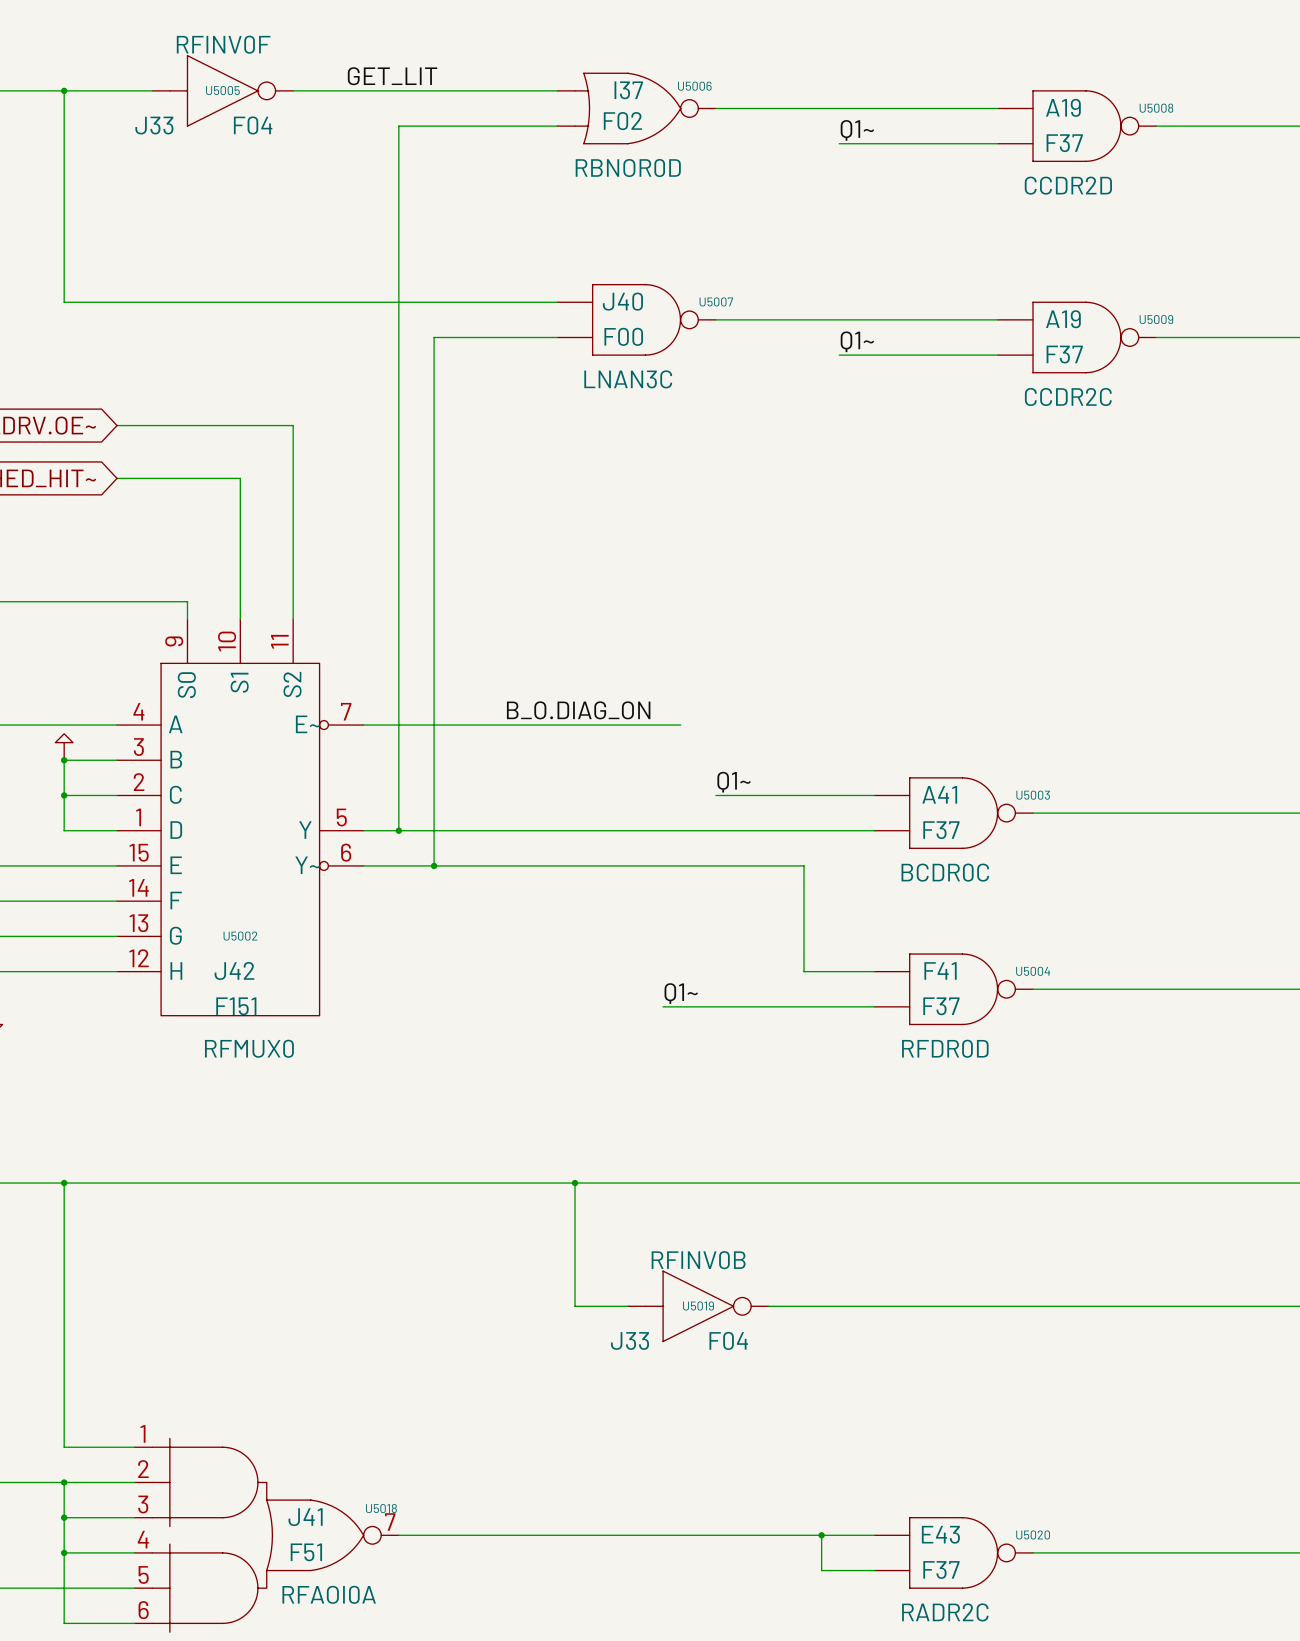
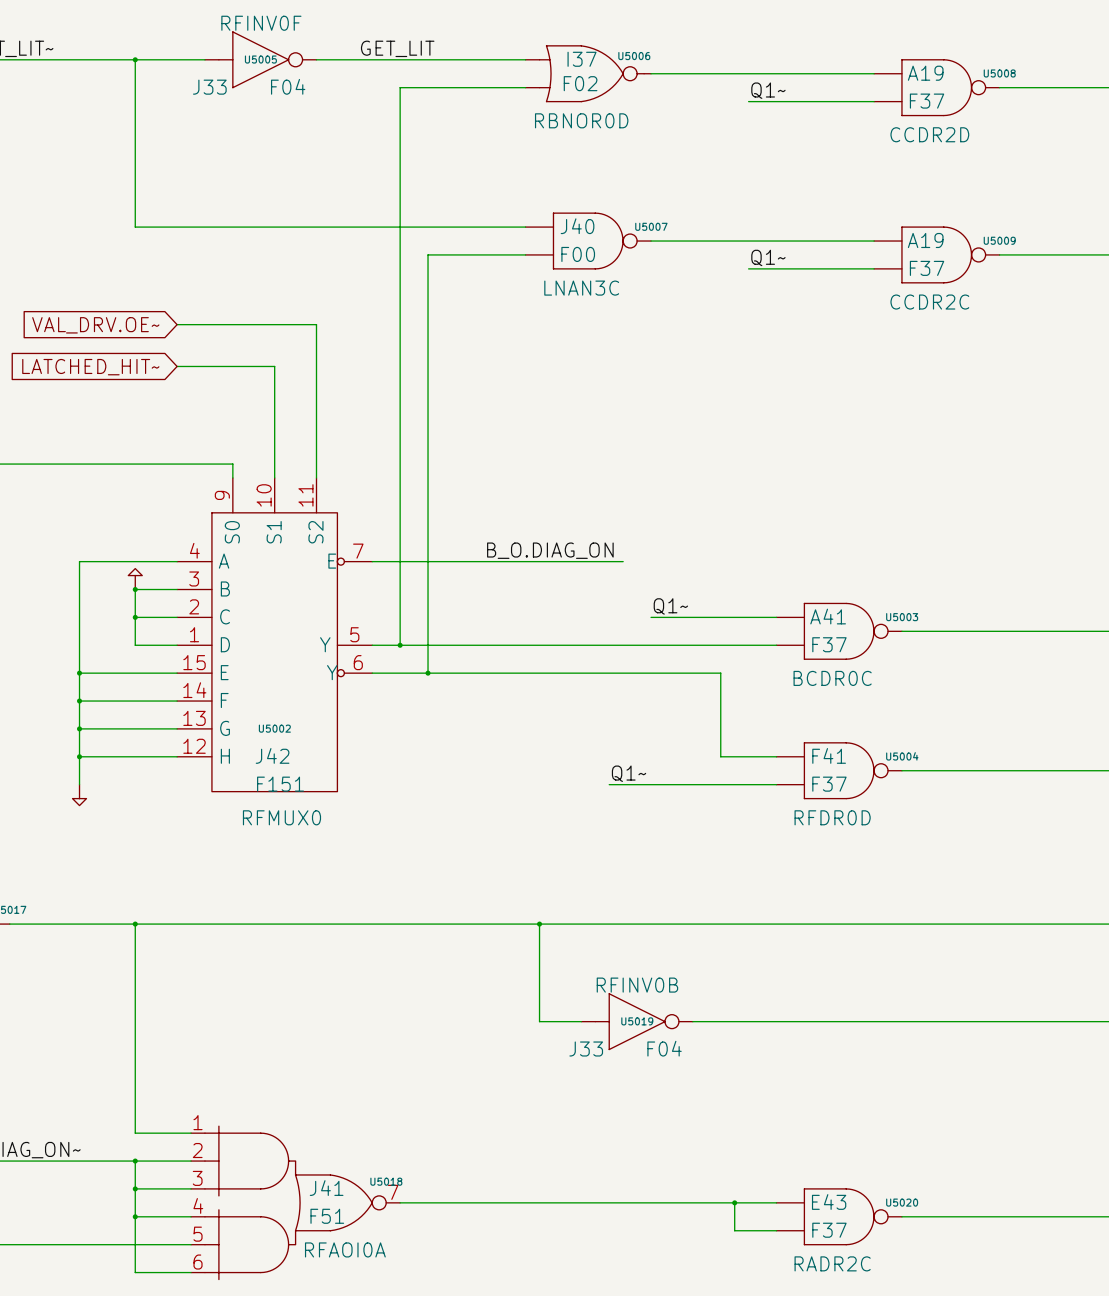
U5002 pin name: E~ (308, 724) -> E (332, 561)
U5002 pin name: Y~ (307, 865) -> Y (332, 672)

